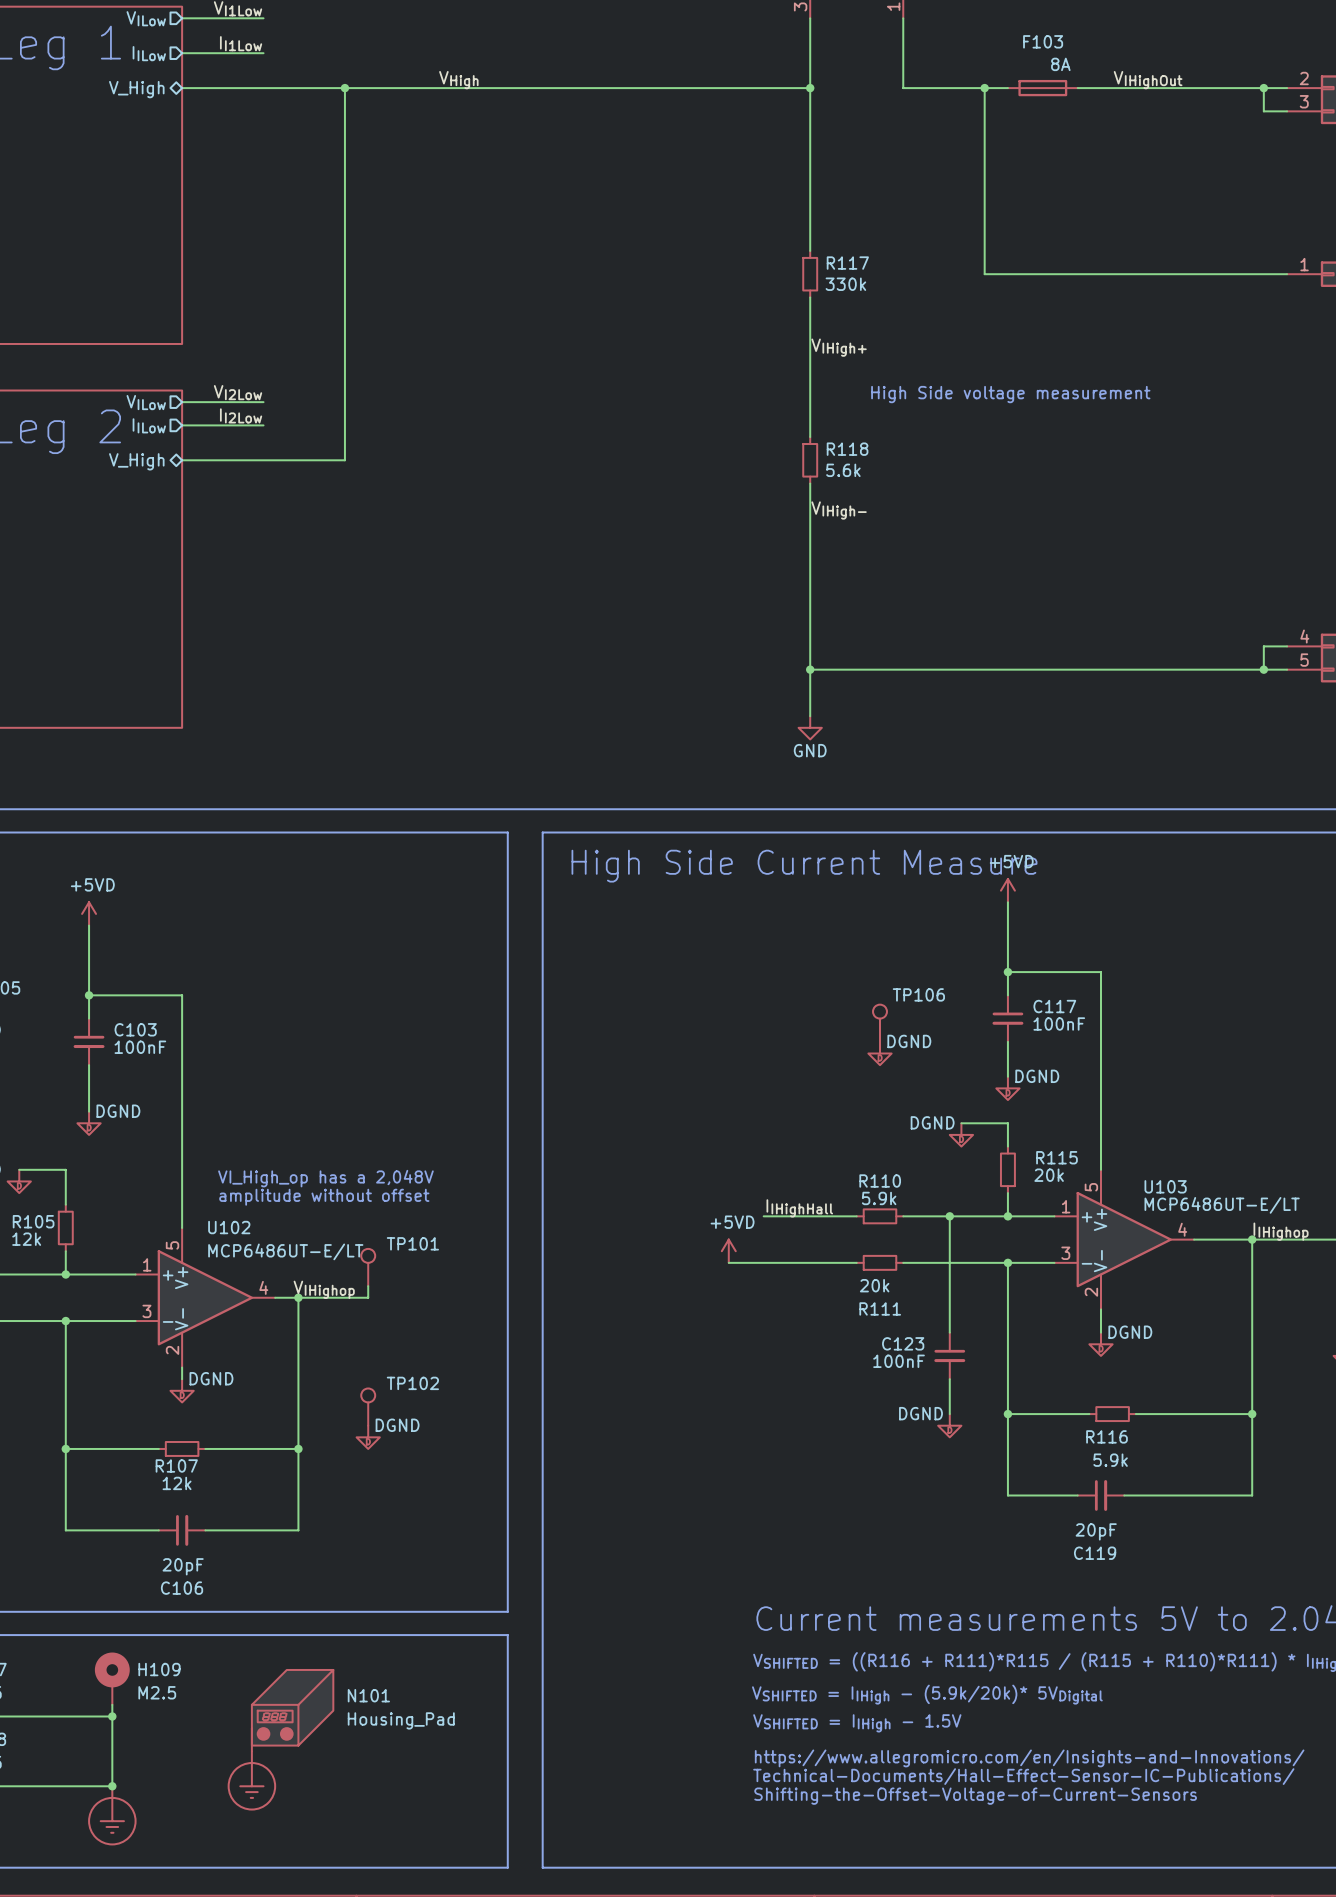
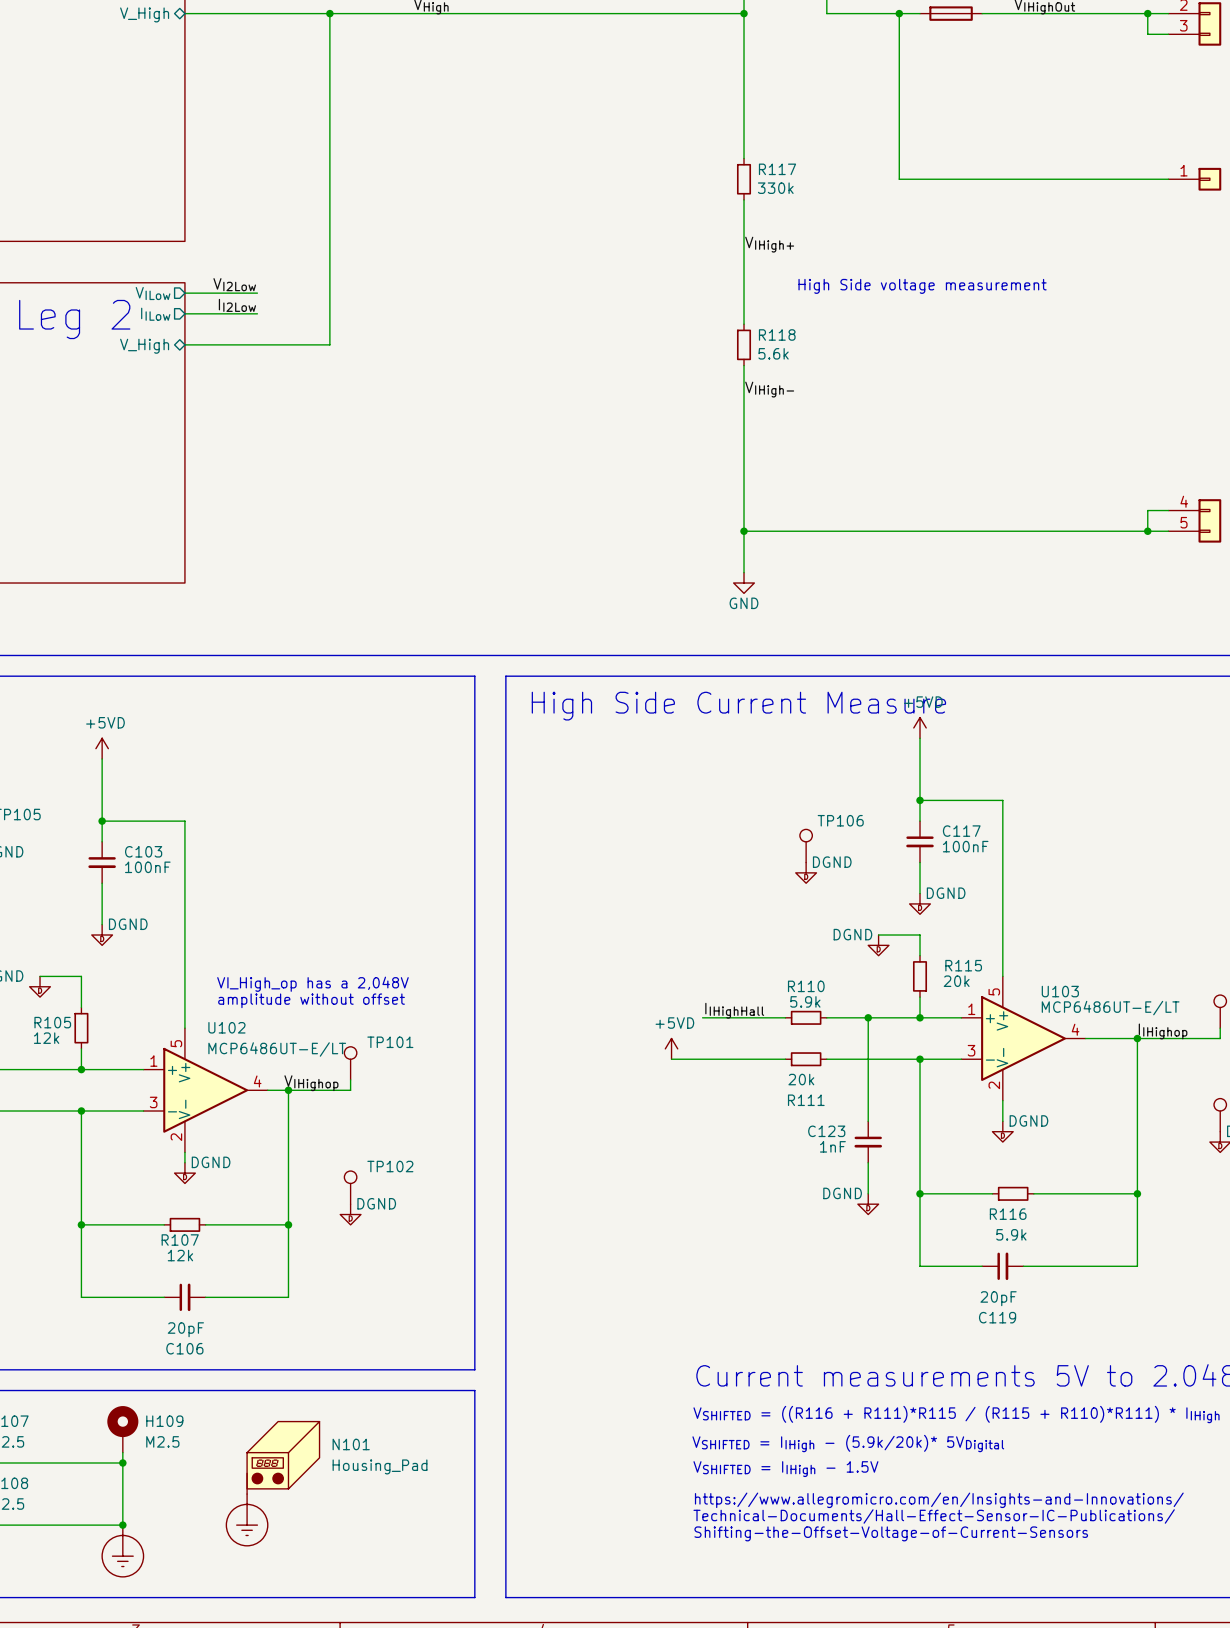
C123 value: 100nF (899, 1361) -> 1nF (832, 1146)

